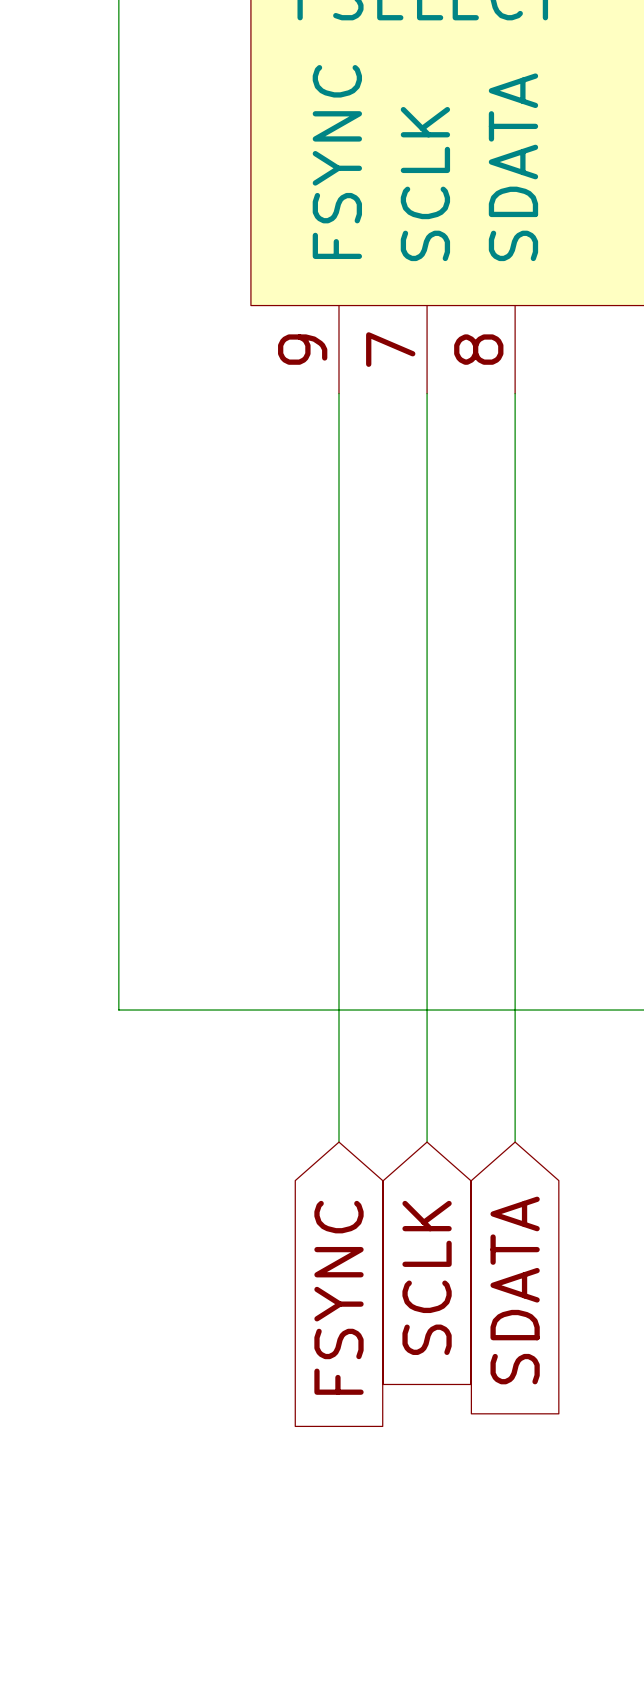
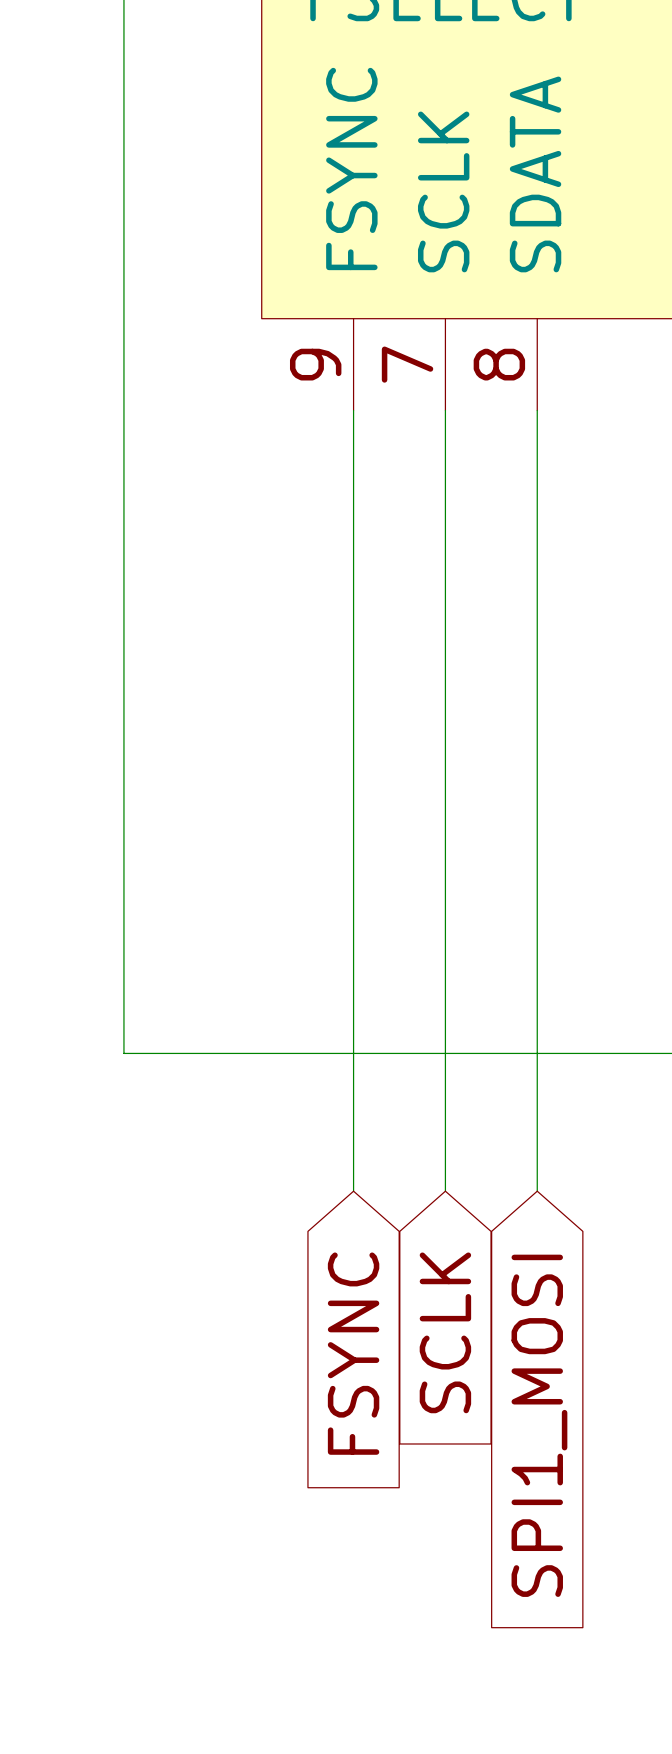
global label: SDATA (515, 1290) -> SPI1_MOSI (539, 1425)

